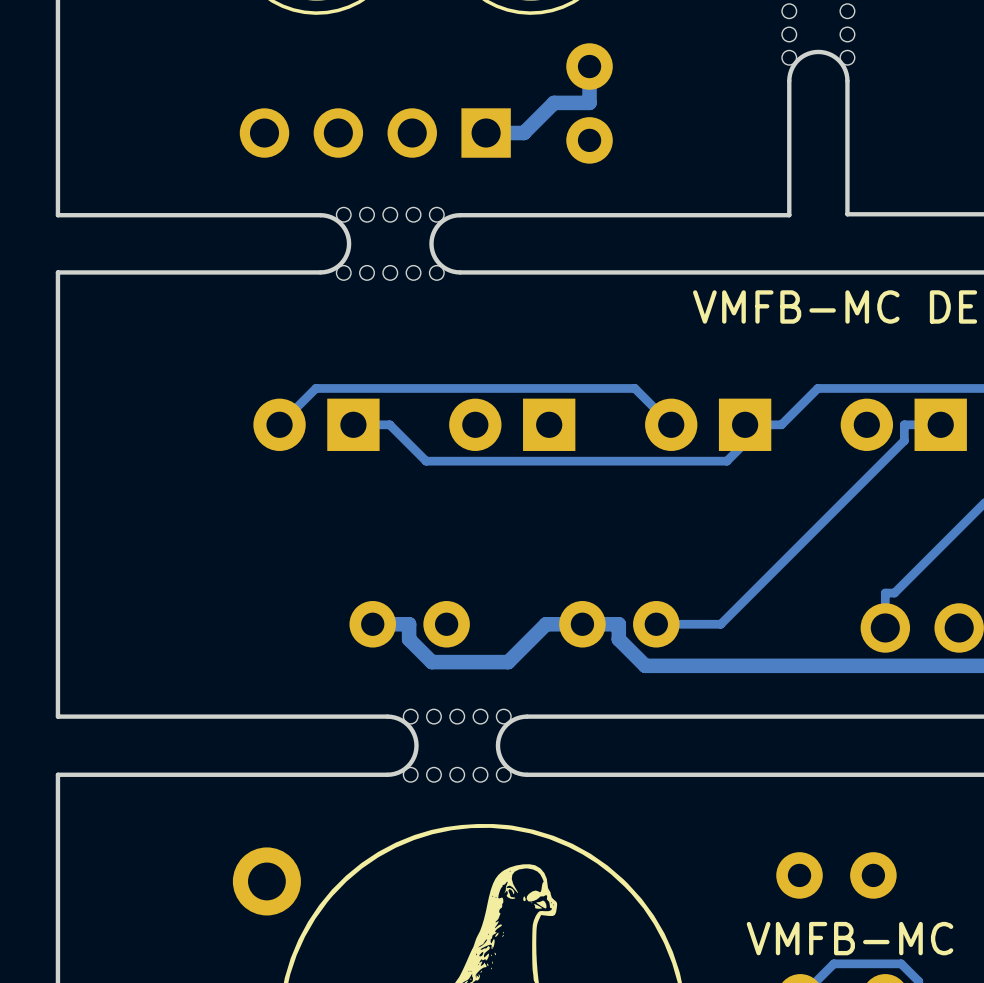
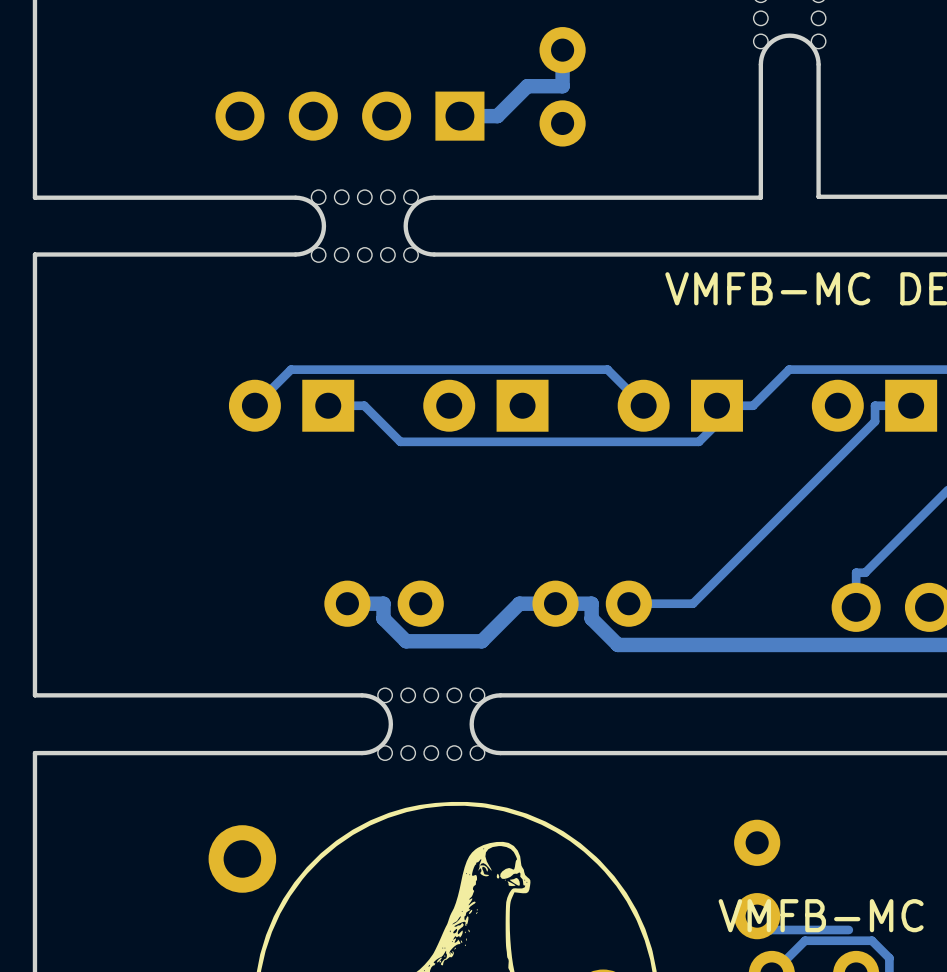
part rotation: 0° (836, 875) -> 90° clockwise (757, 879)
track: none -> (757, 916) (771, 929) (848, 929)

